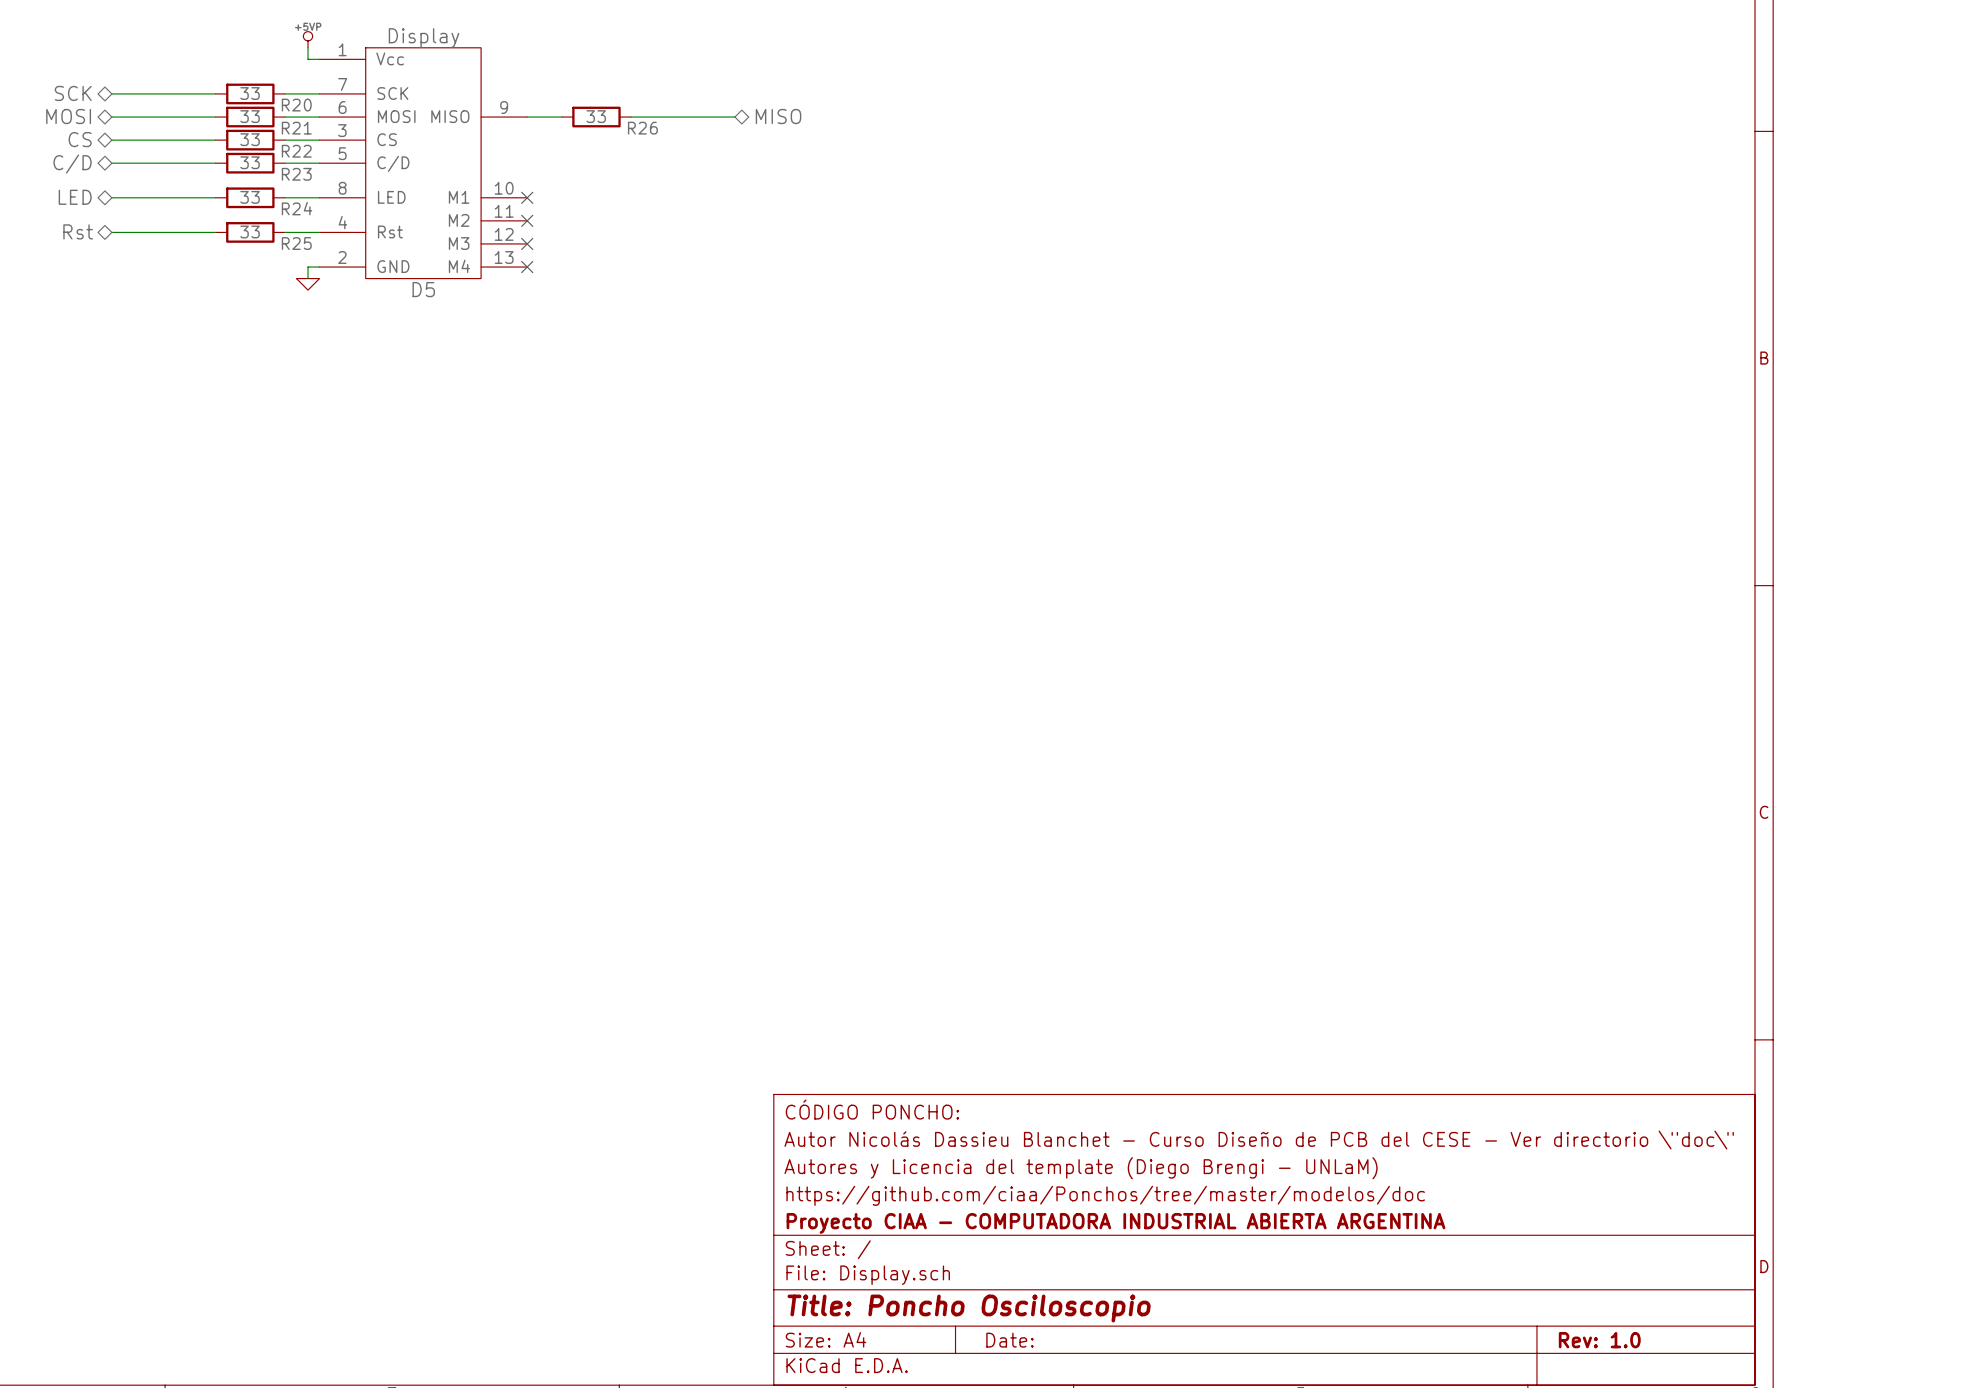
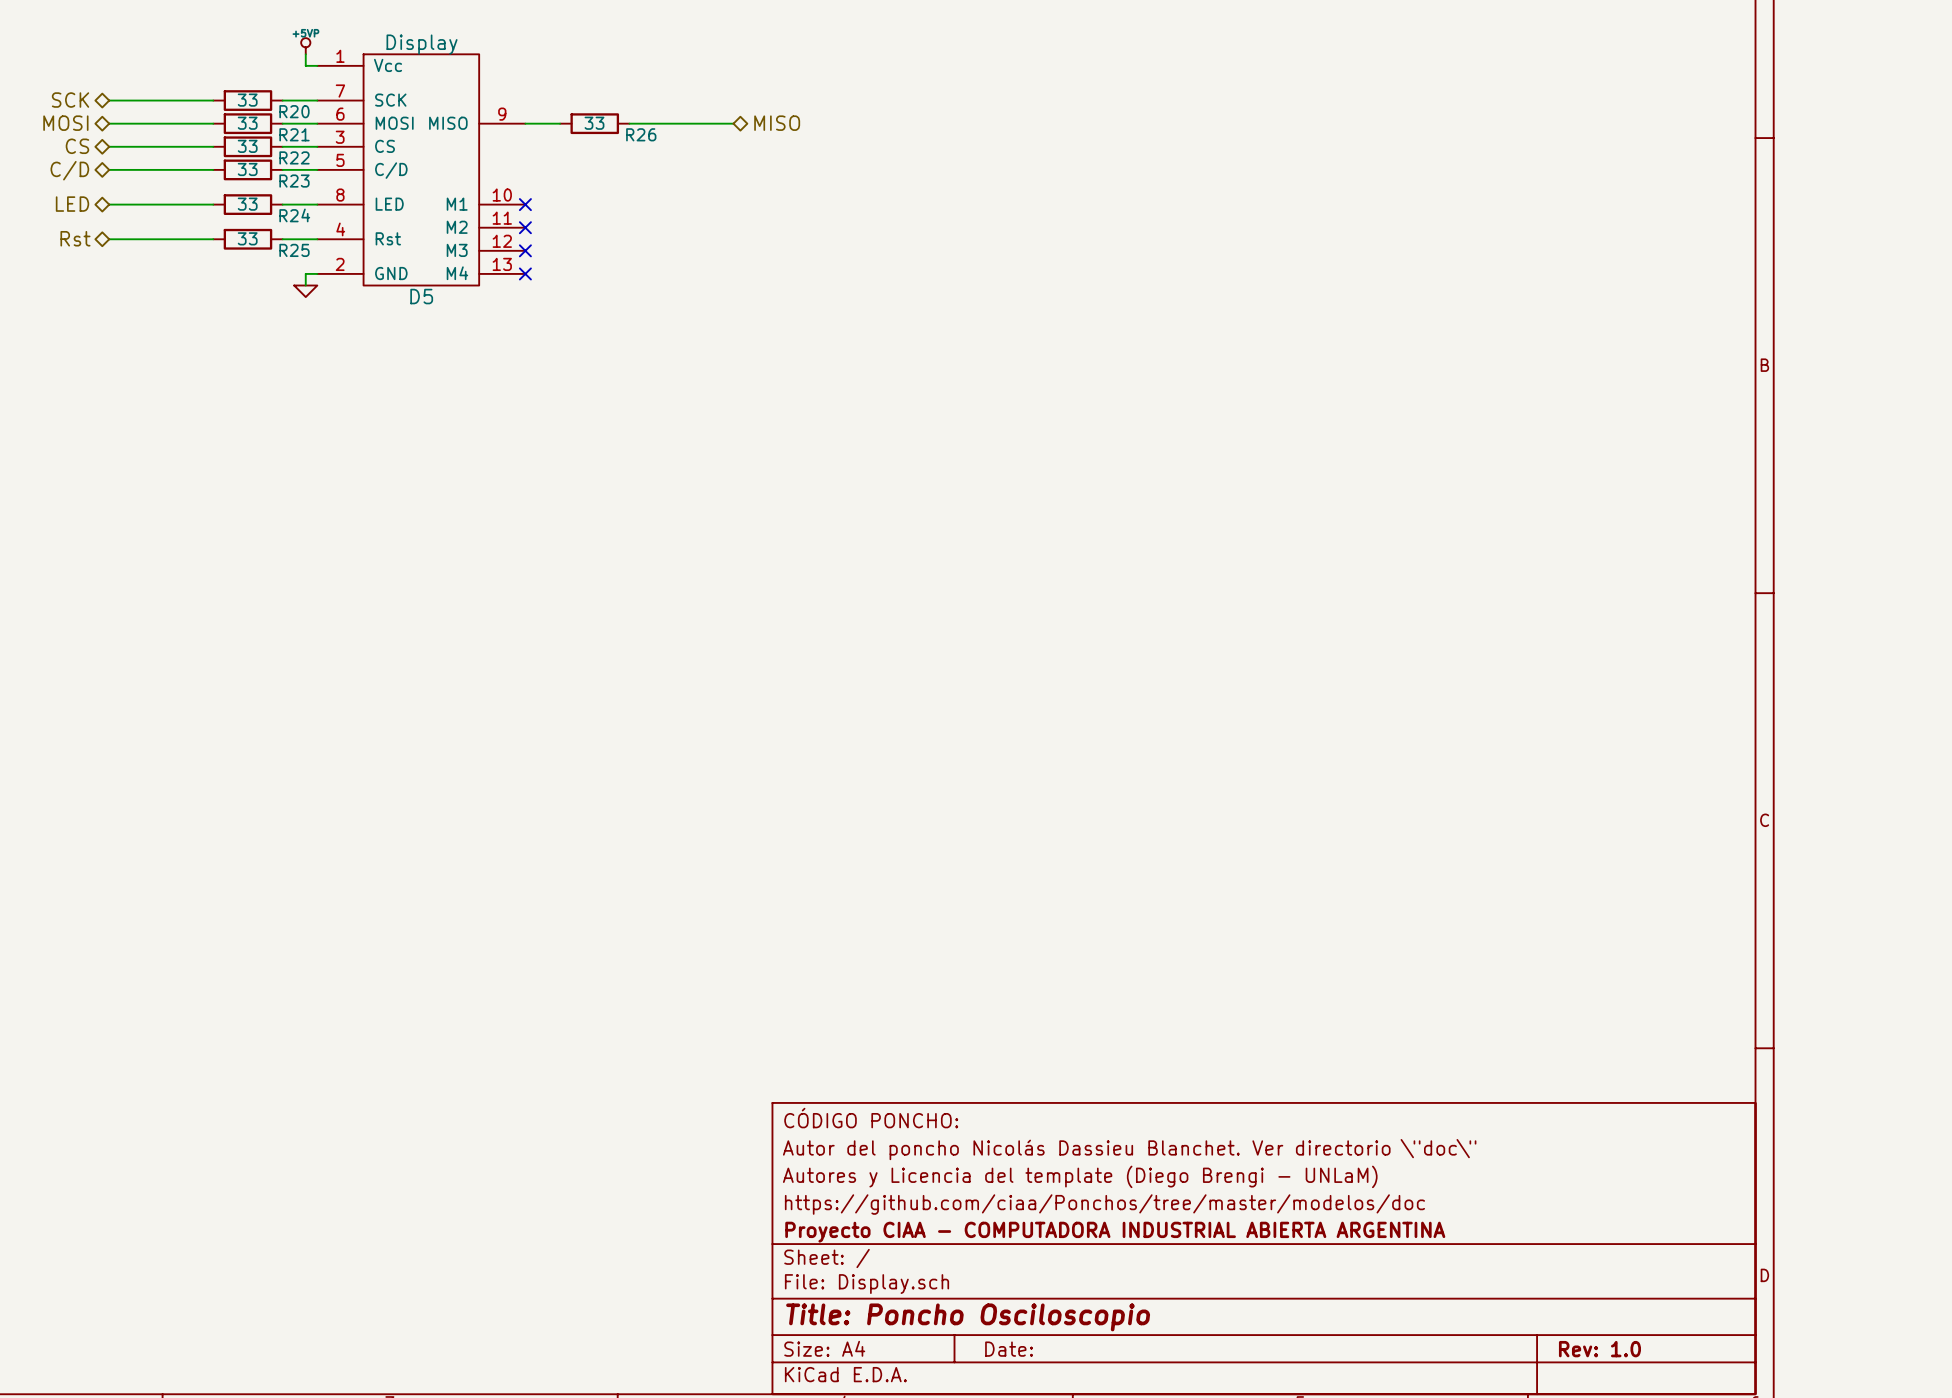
title block: Autor Nicolás Dassieu Blanchet - Curso Diseño de PCB del CESE - Ver directorio \"doc\" (1259, 1140) -> Autor del poncho Nicolás Dassieu Blanchet. Ver directorio \"doc\" (1129, 1149)

